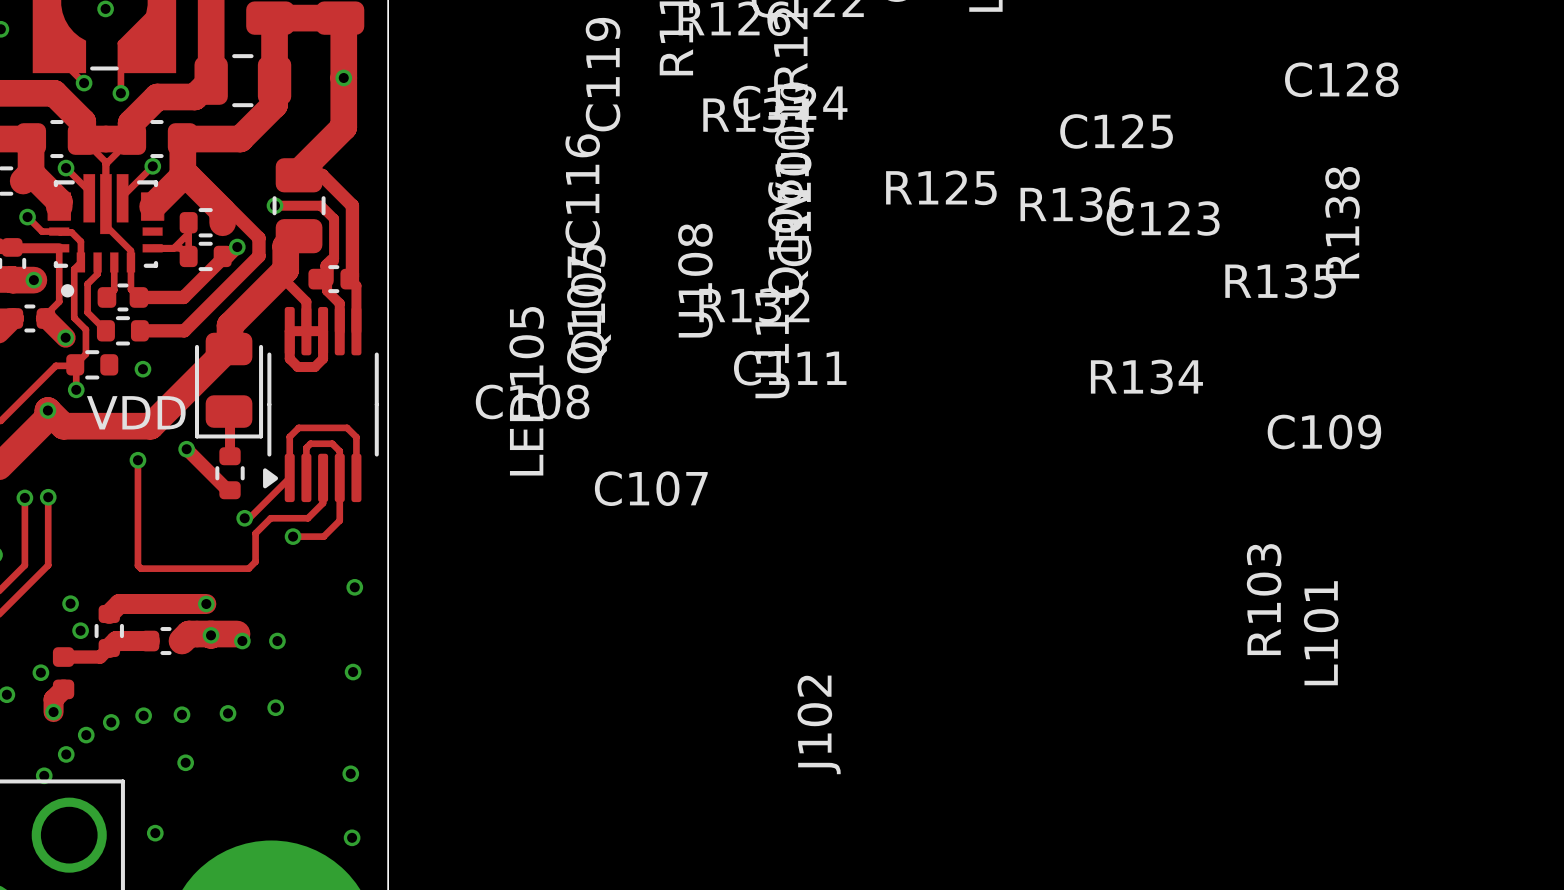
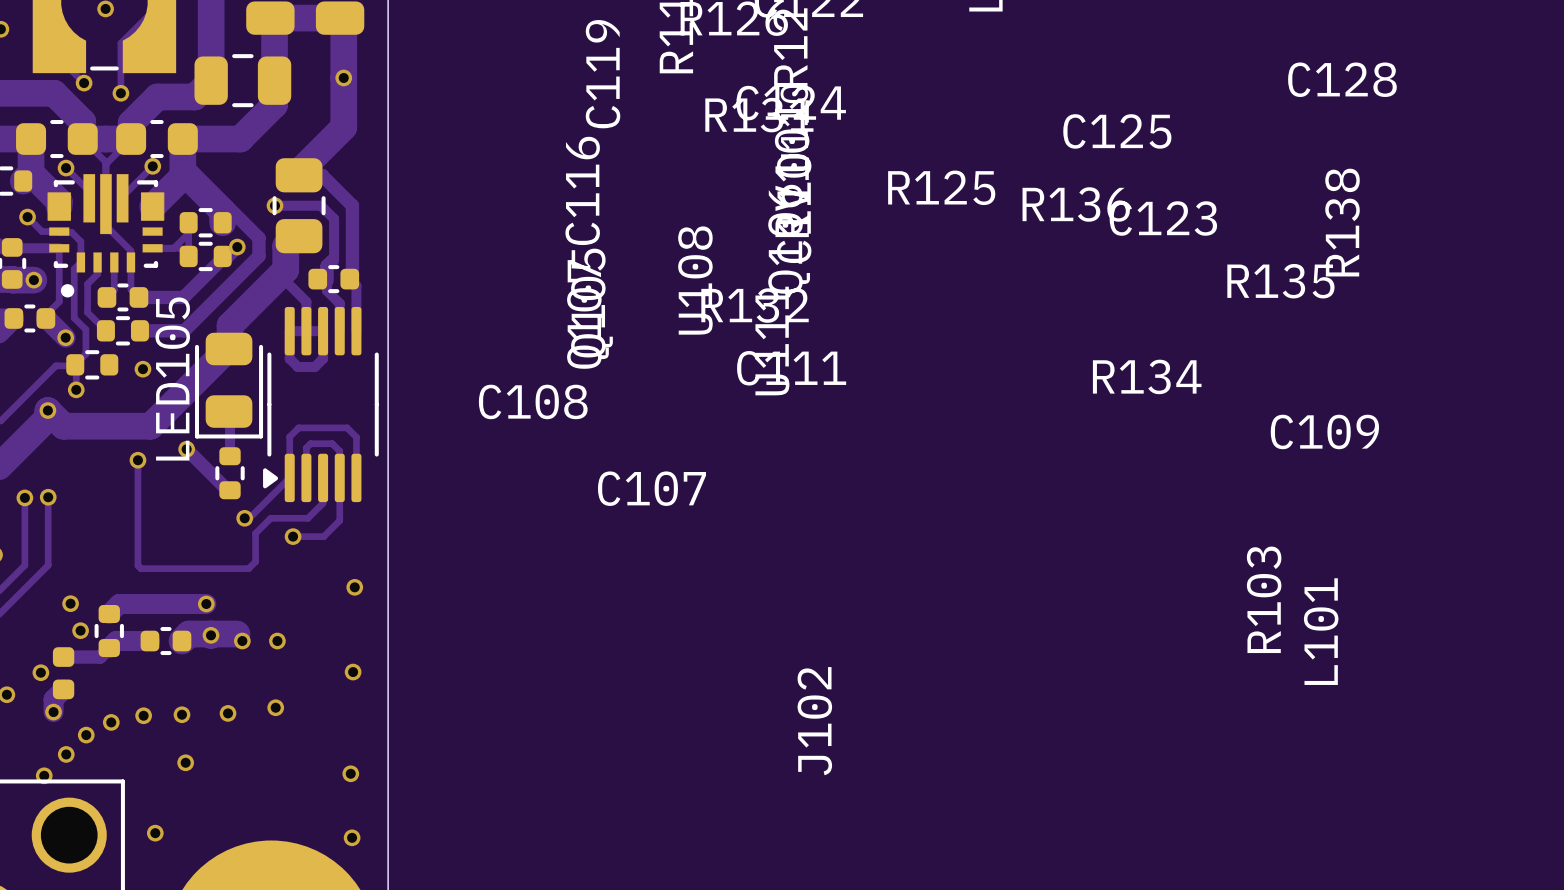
LED105 name position: LED105 (526, 391) -> LED105 (172, 379)
text: VDD (136, 412) -> none

